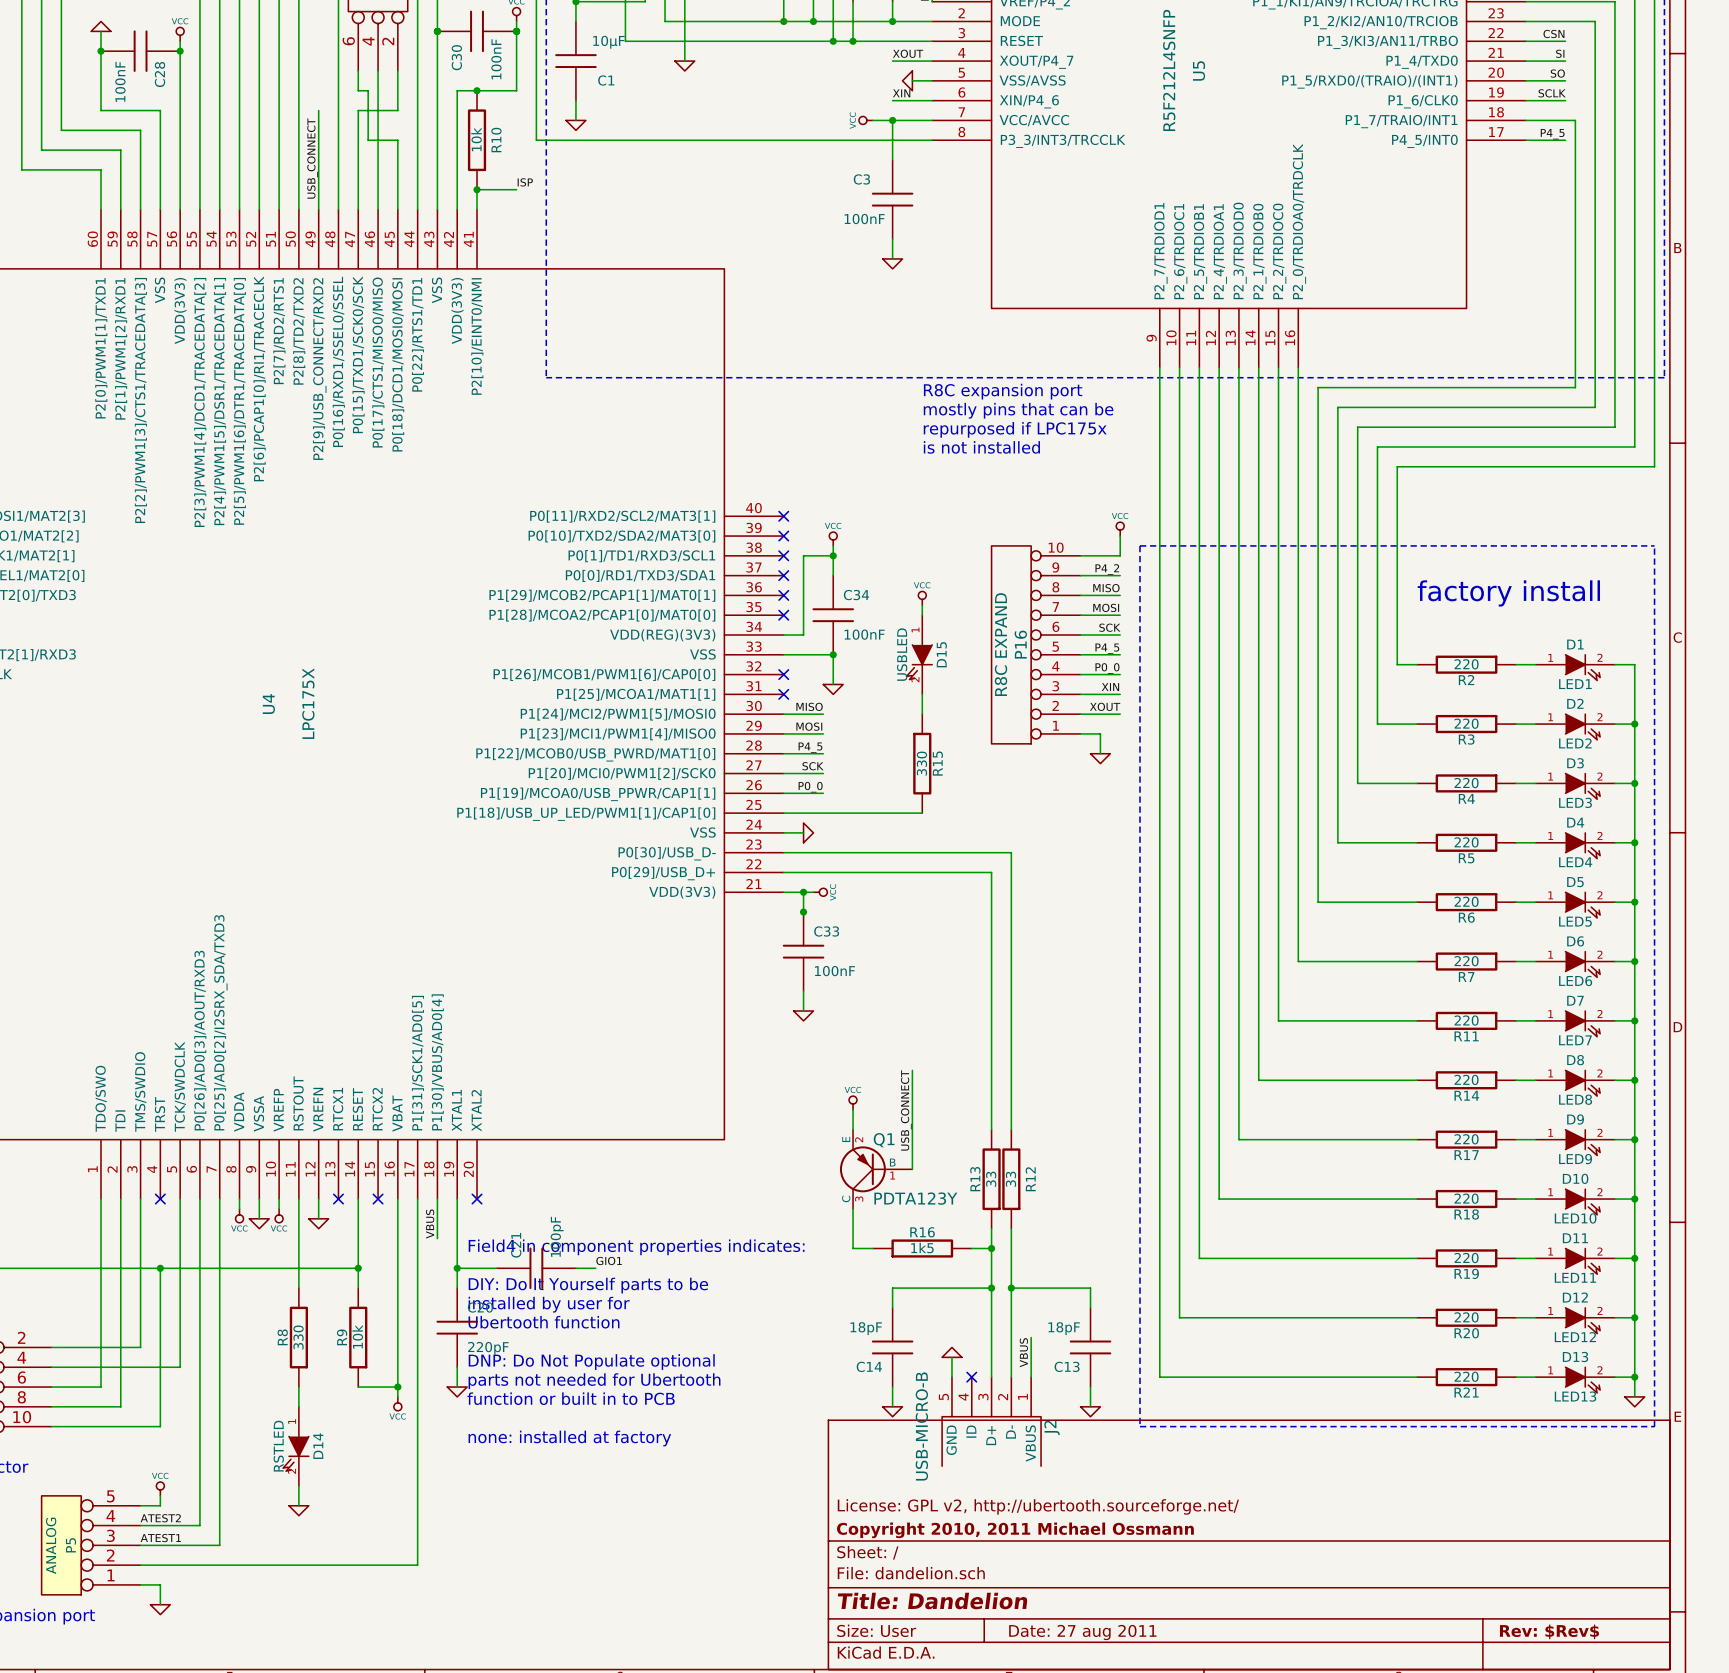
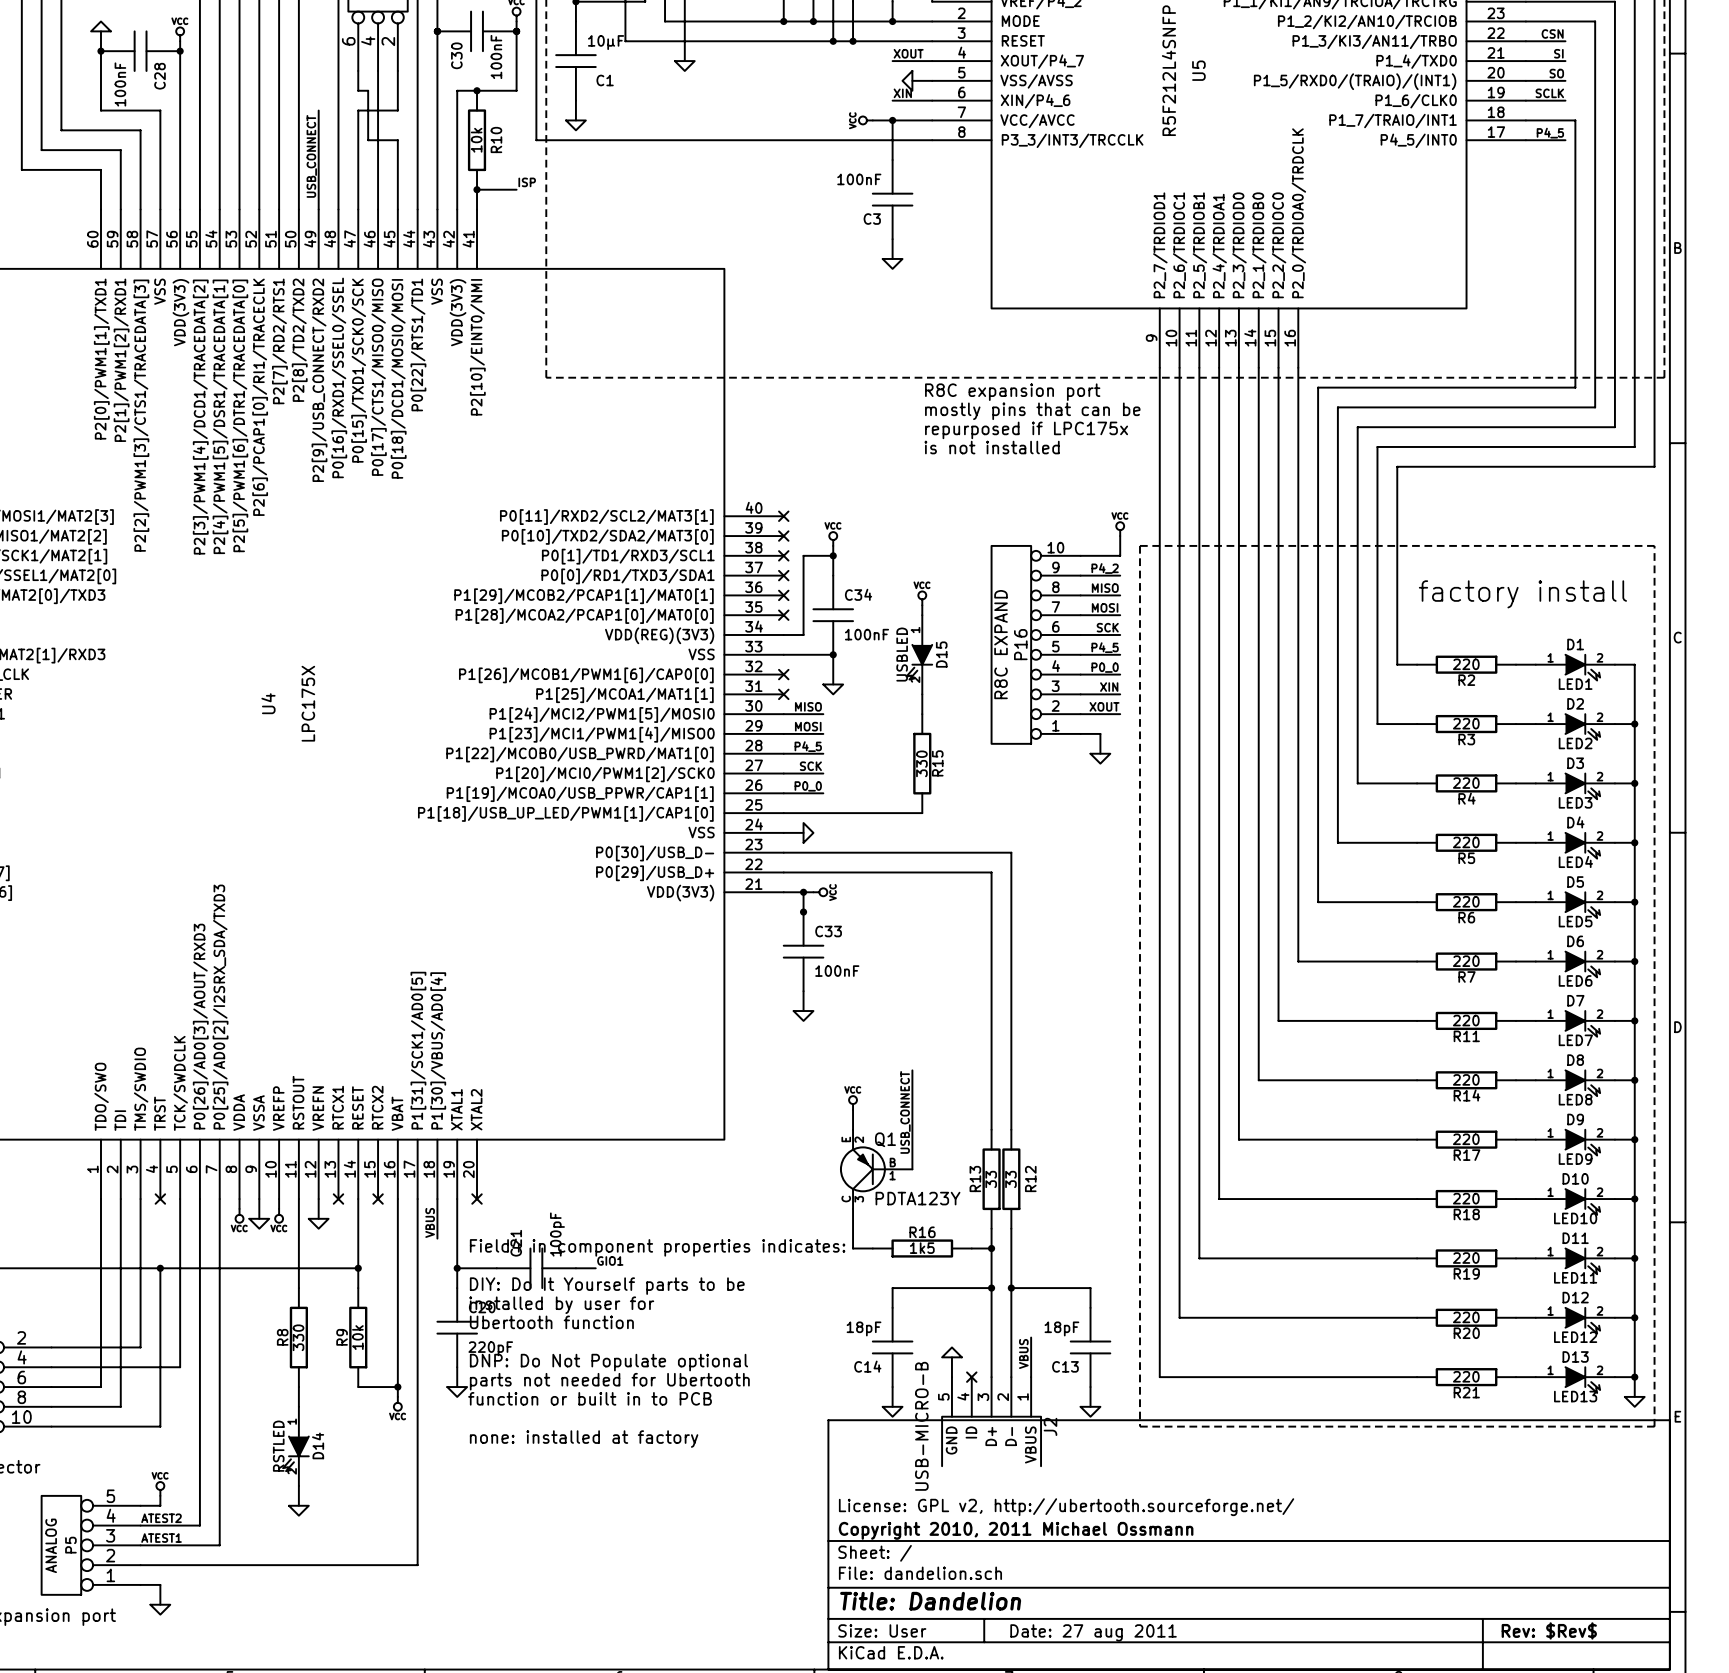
C3 name position: C3 (861, 179) -> C3 (872, 219)
C3 value position: 100nF (864, 219) -> 100nF (859, 179)

